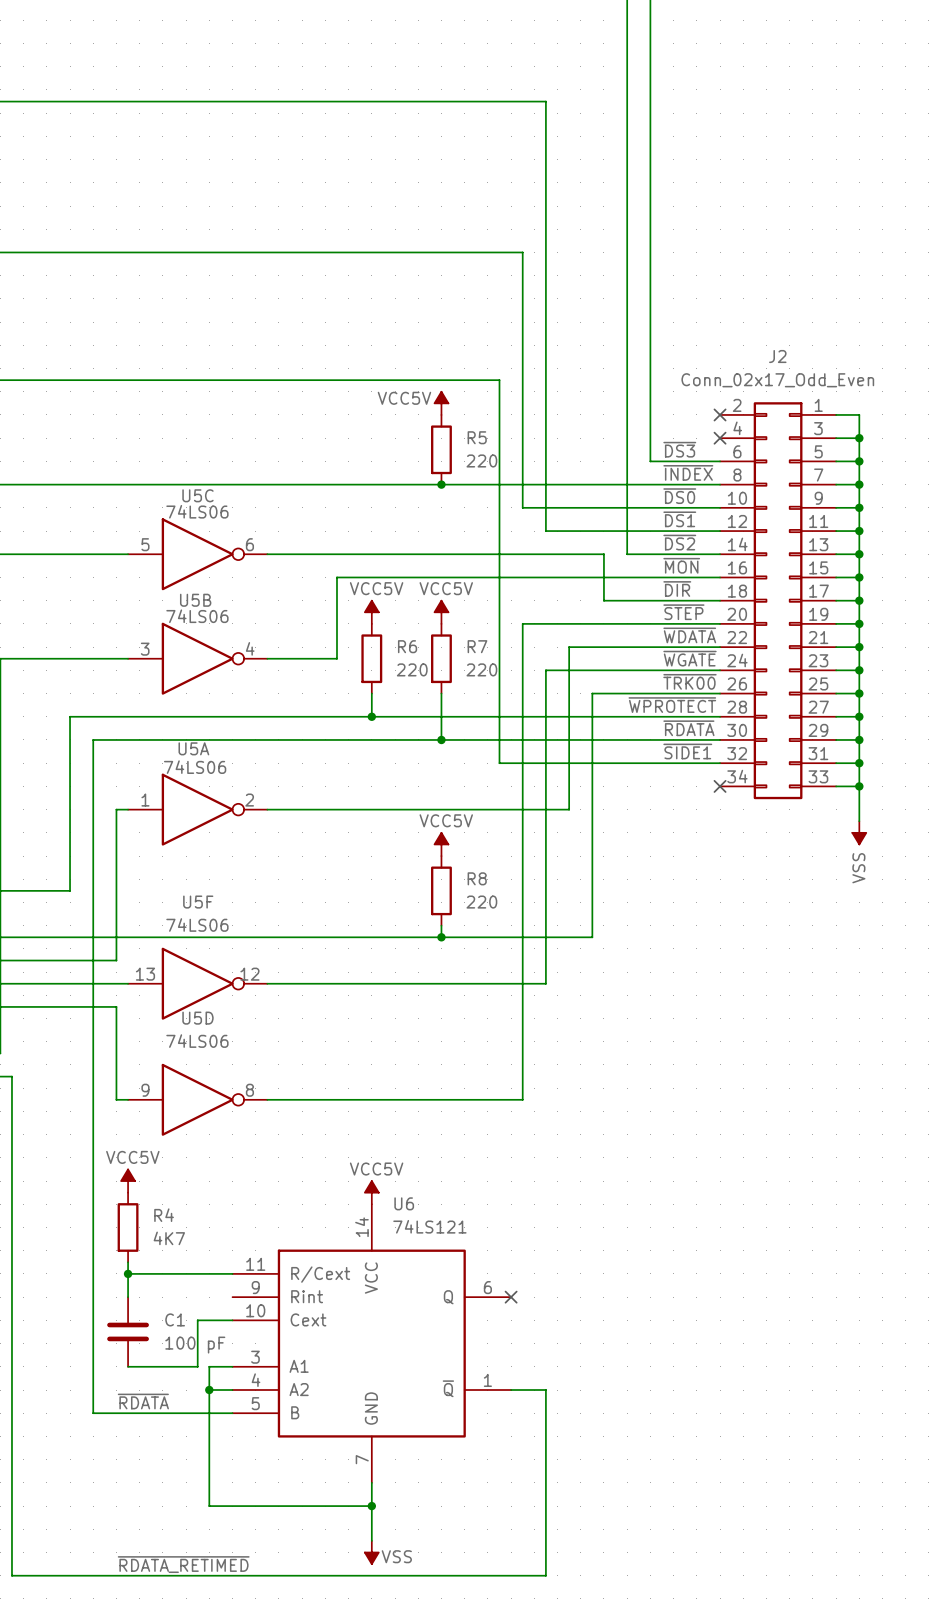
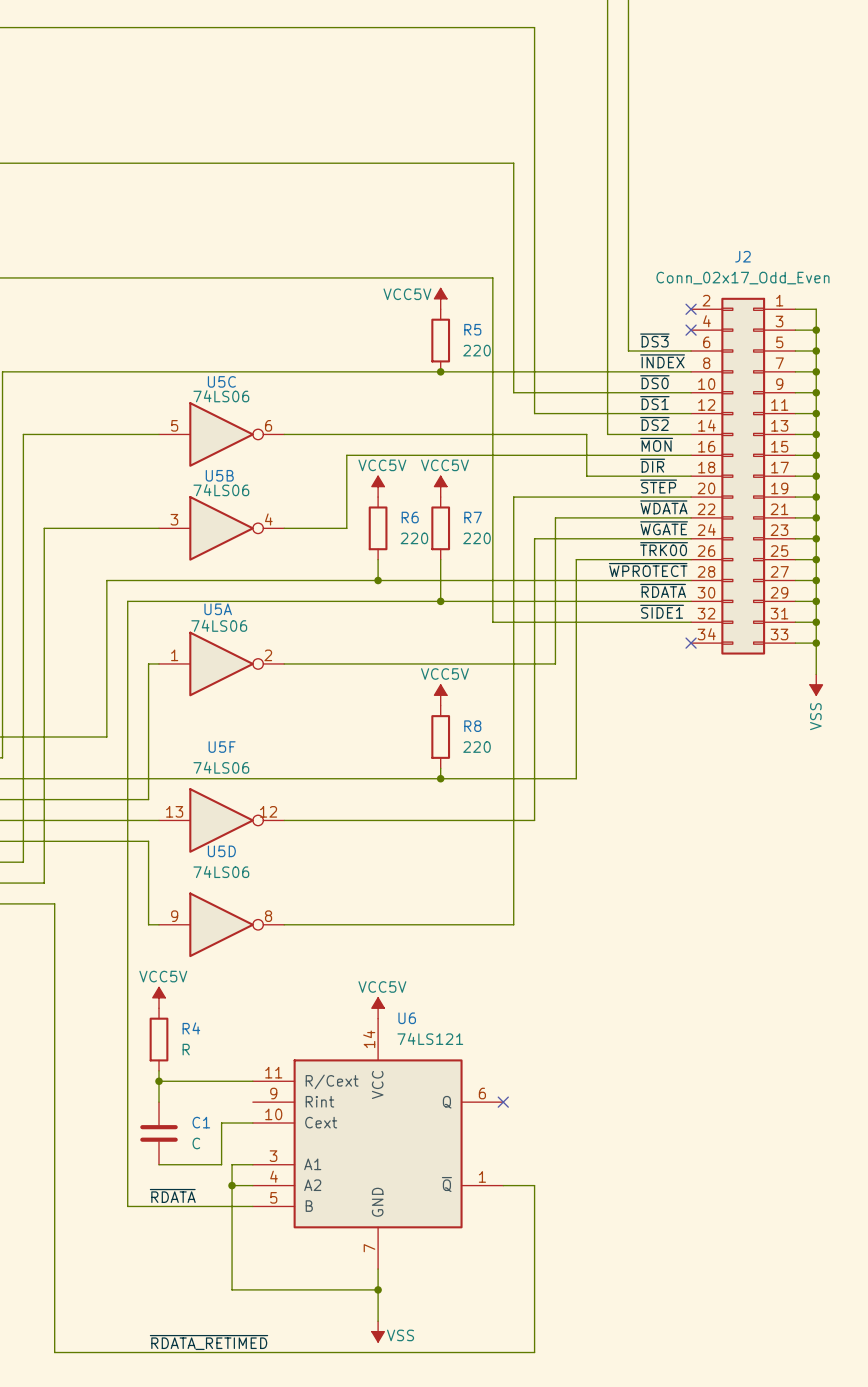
R4 value: 4K7 (169, 1238) -> R (186, 1049)
C1 value: 100 pF (195, 1345) -> C (196, 1143)

